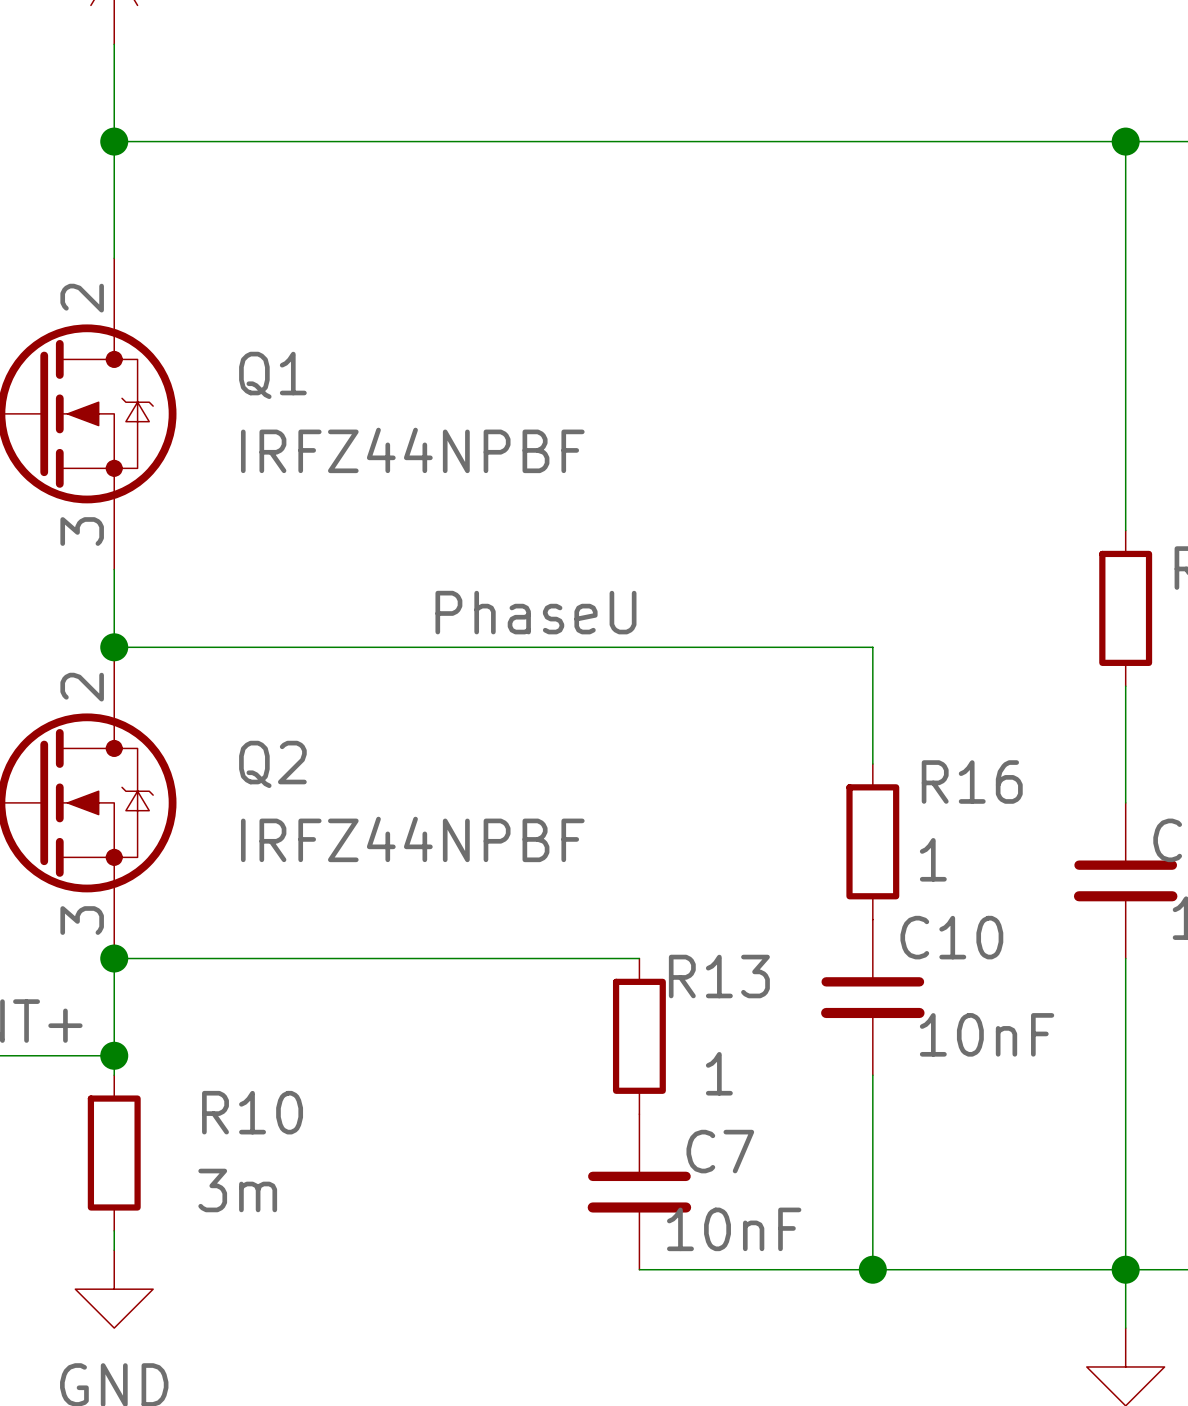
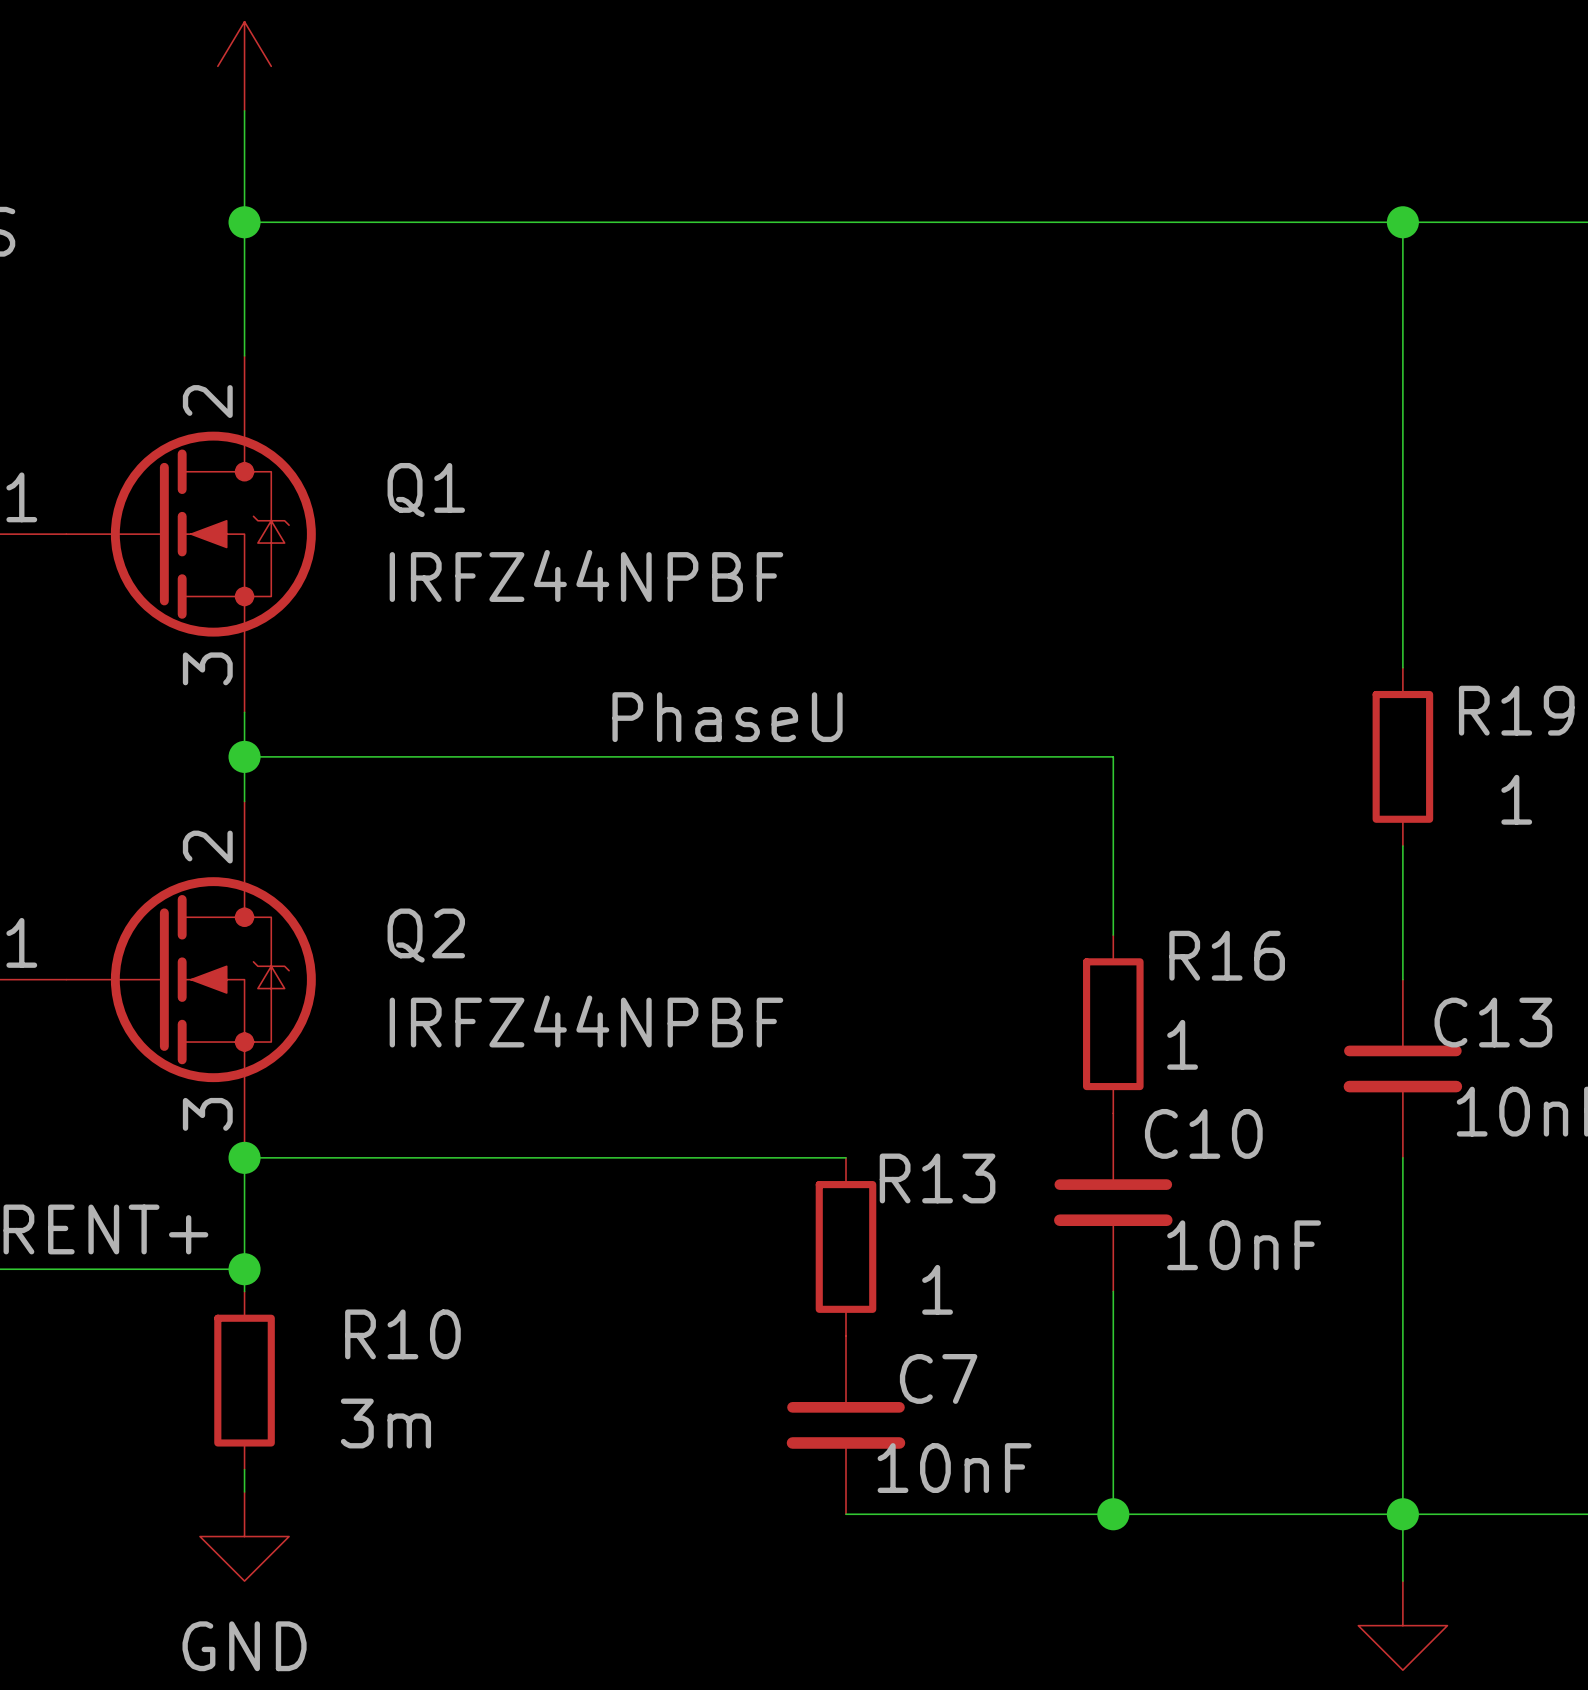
label position: PhaseU (535, 612) -> PhaseU (727, 717)
wire: (114, 647) (872, 647) -> (244, 756) (1113, 756) (1113, 801)
junction position: (114, 647) -> (244, 756)

